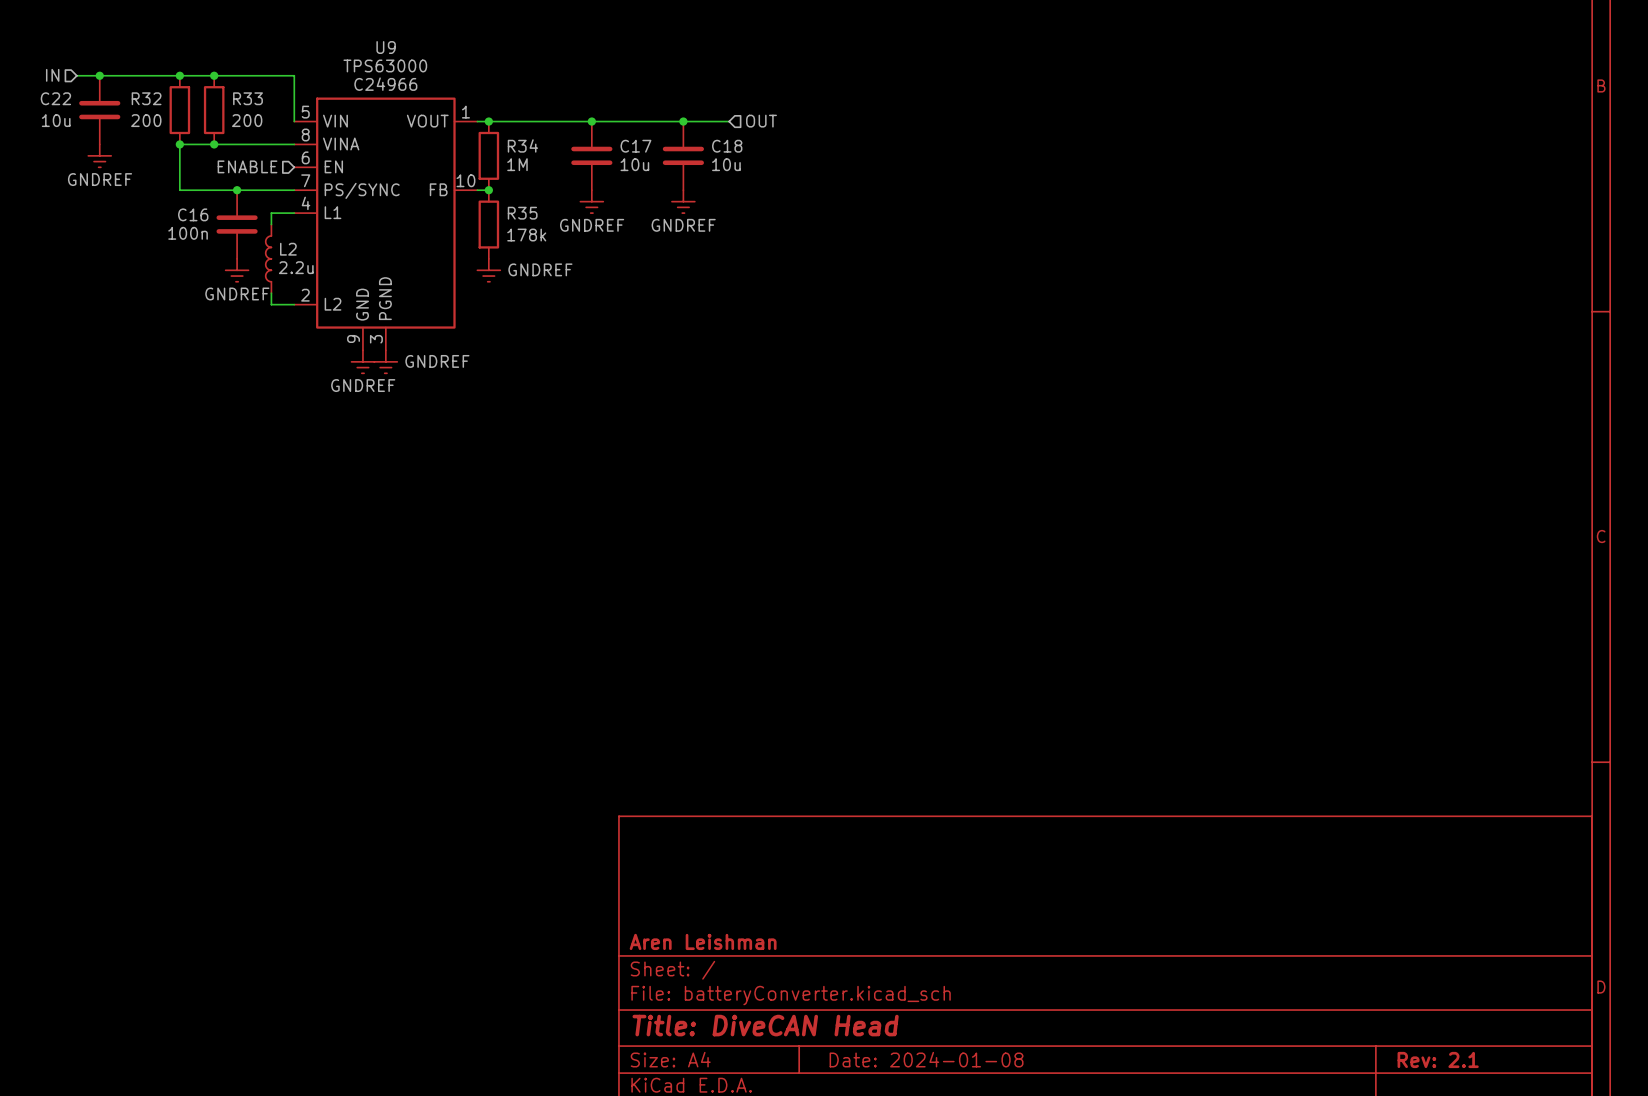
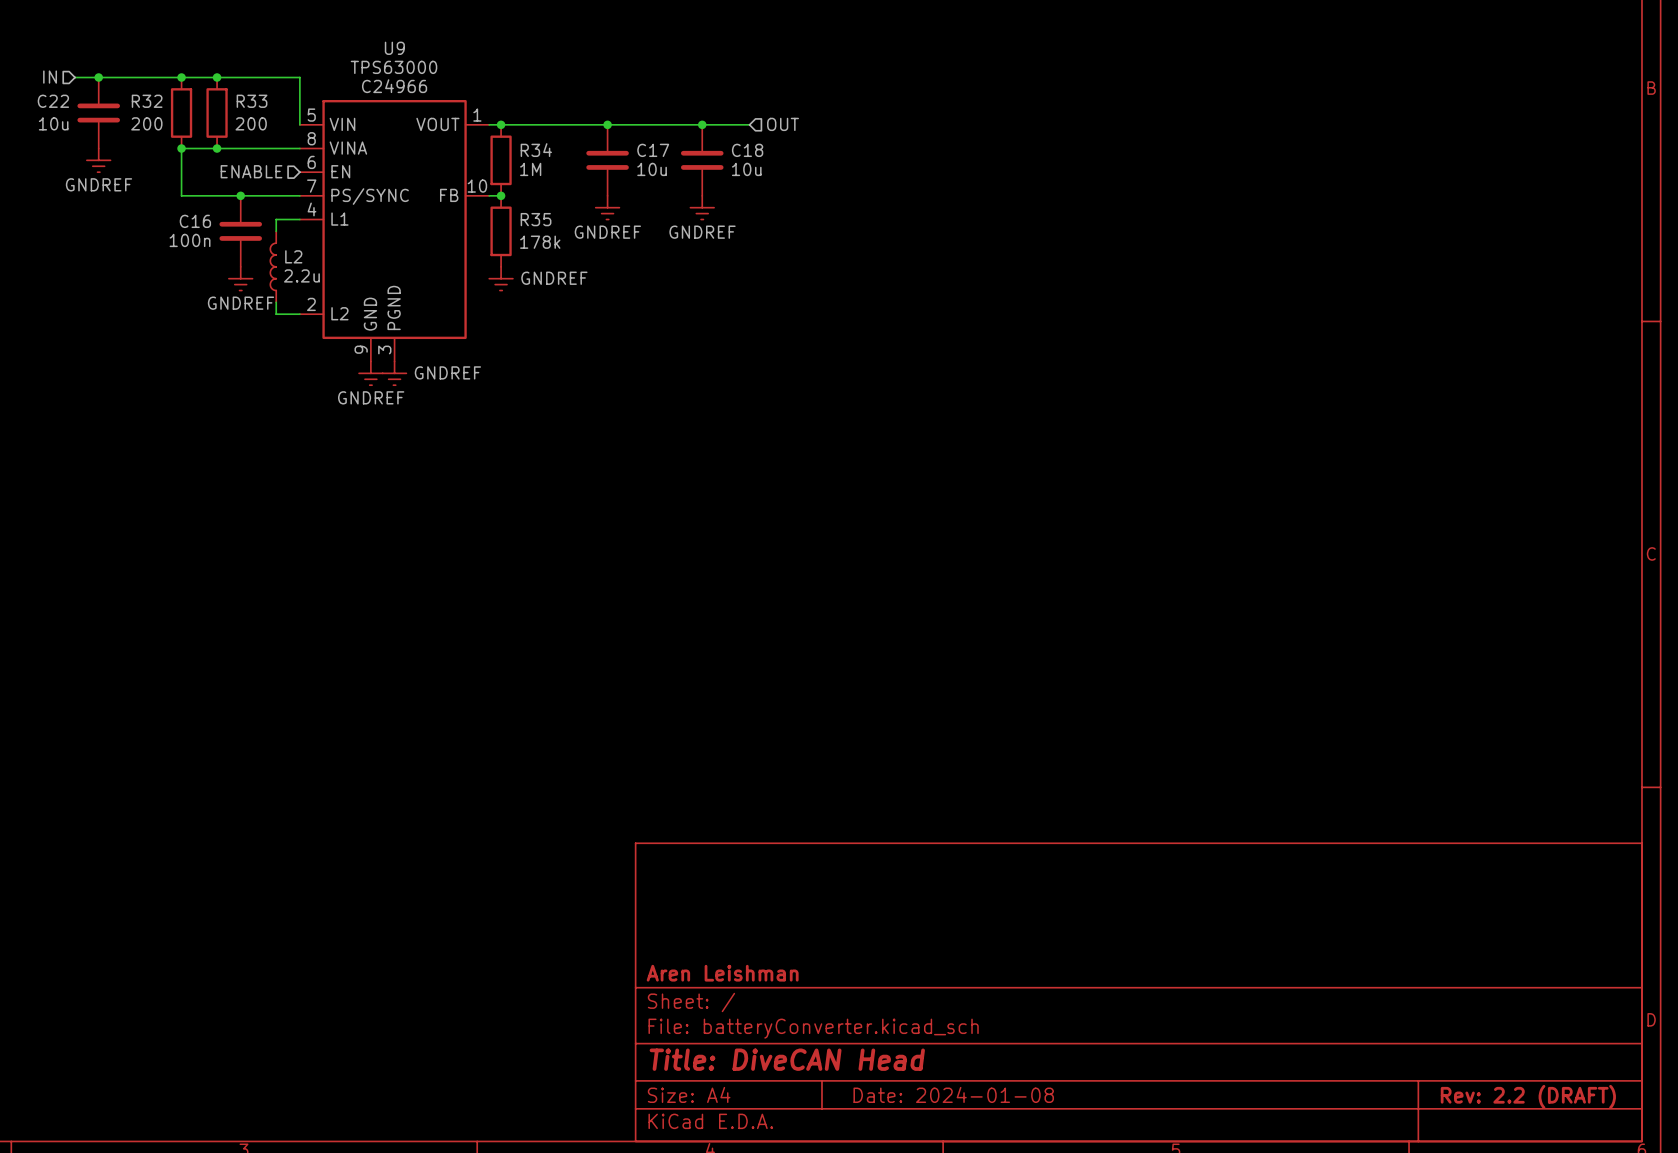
title block: Rev: 2.1 (1438, 1059) -> Rev: 2.2 (DRAFT) (1528, 1096)

